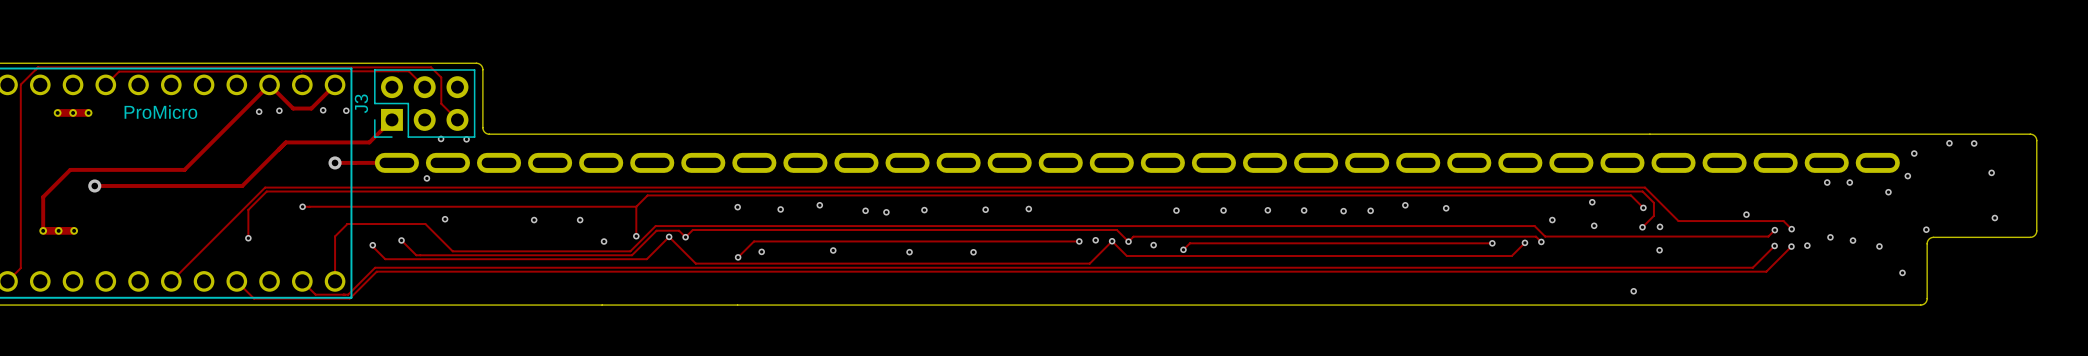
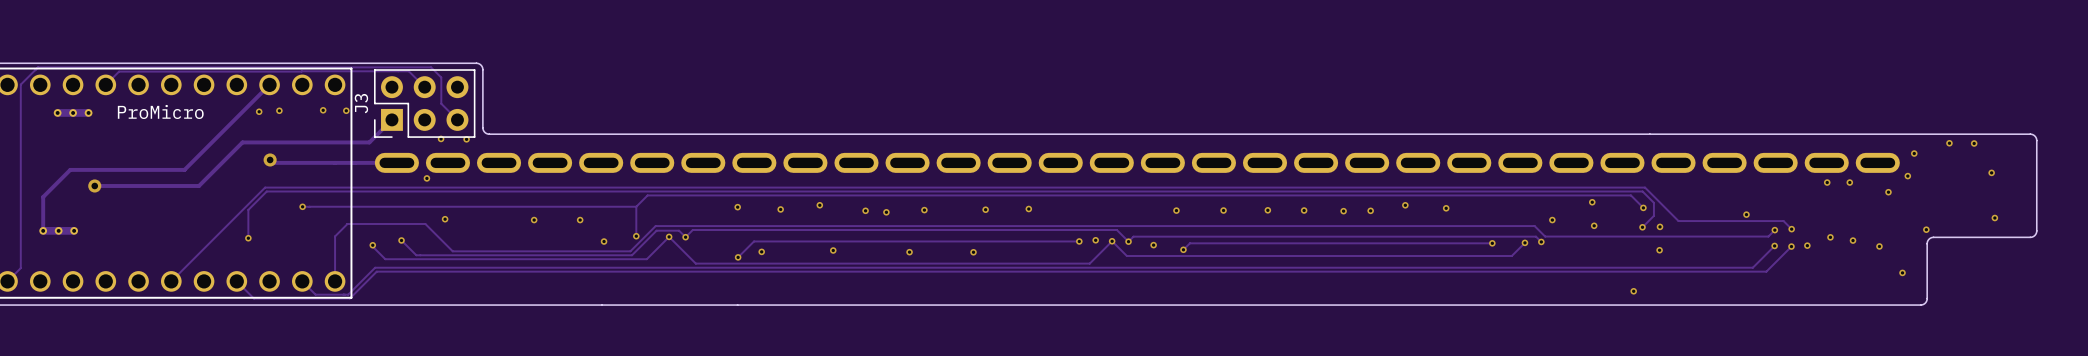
track: (269, 84) (293, 108) (311, 108) (335, 84) -> none
track: (285, 142) (242, 185) (198, 185) -> (285, 142) (242, 142) (198, 185)
track: none -> (270, 159) (273, 162) (335, 162)
via position: (335, 162) -> (270, 159)

